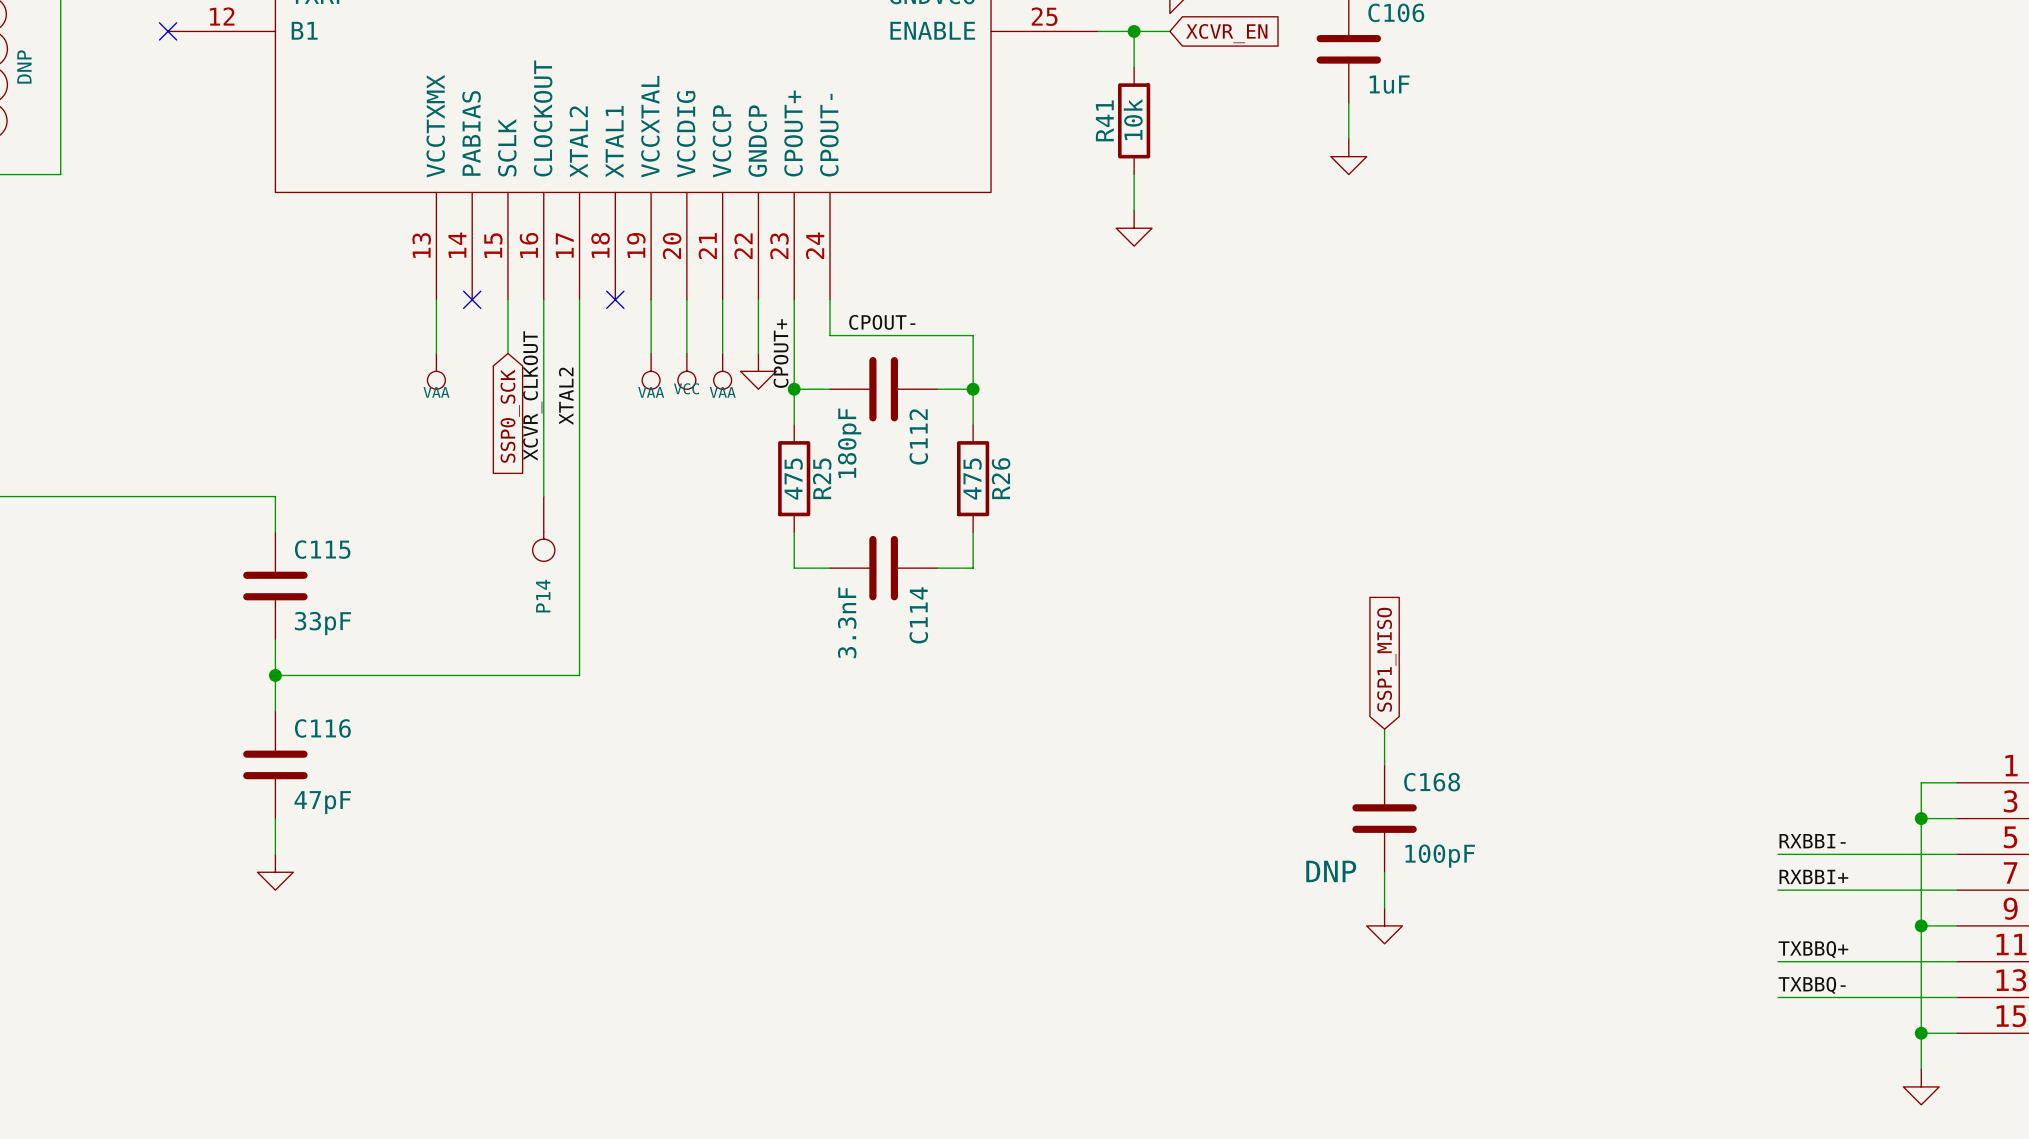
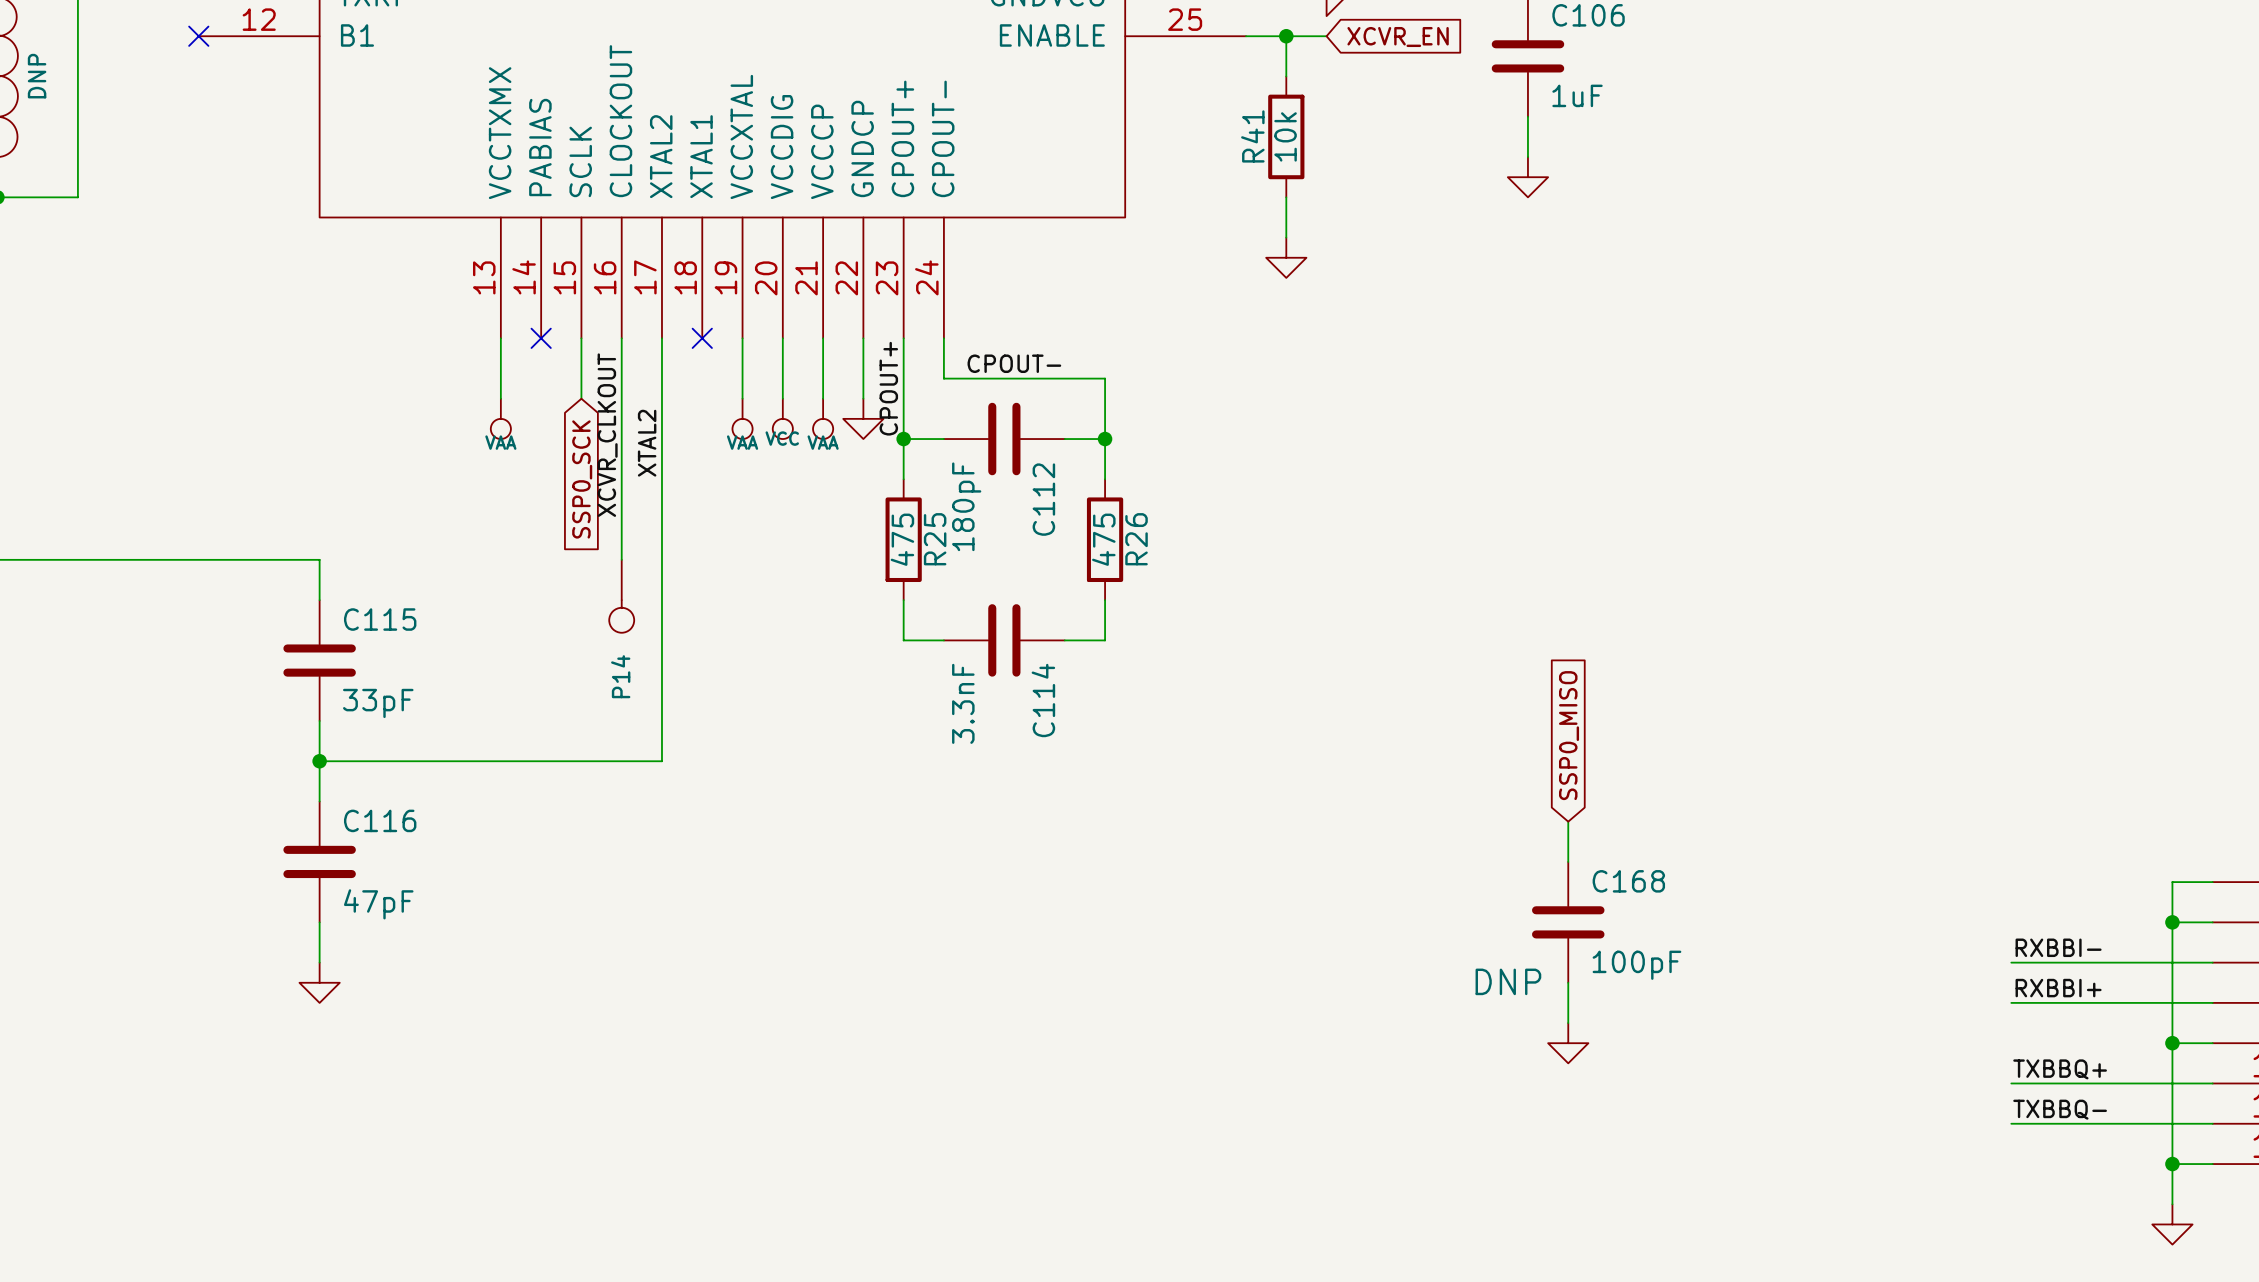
global label: SSP1_MISO (1386, 659) -> SSP0_MISO (1569, 735)

